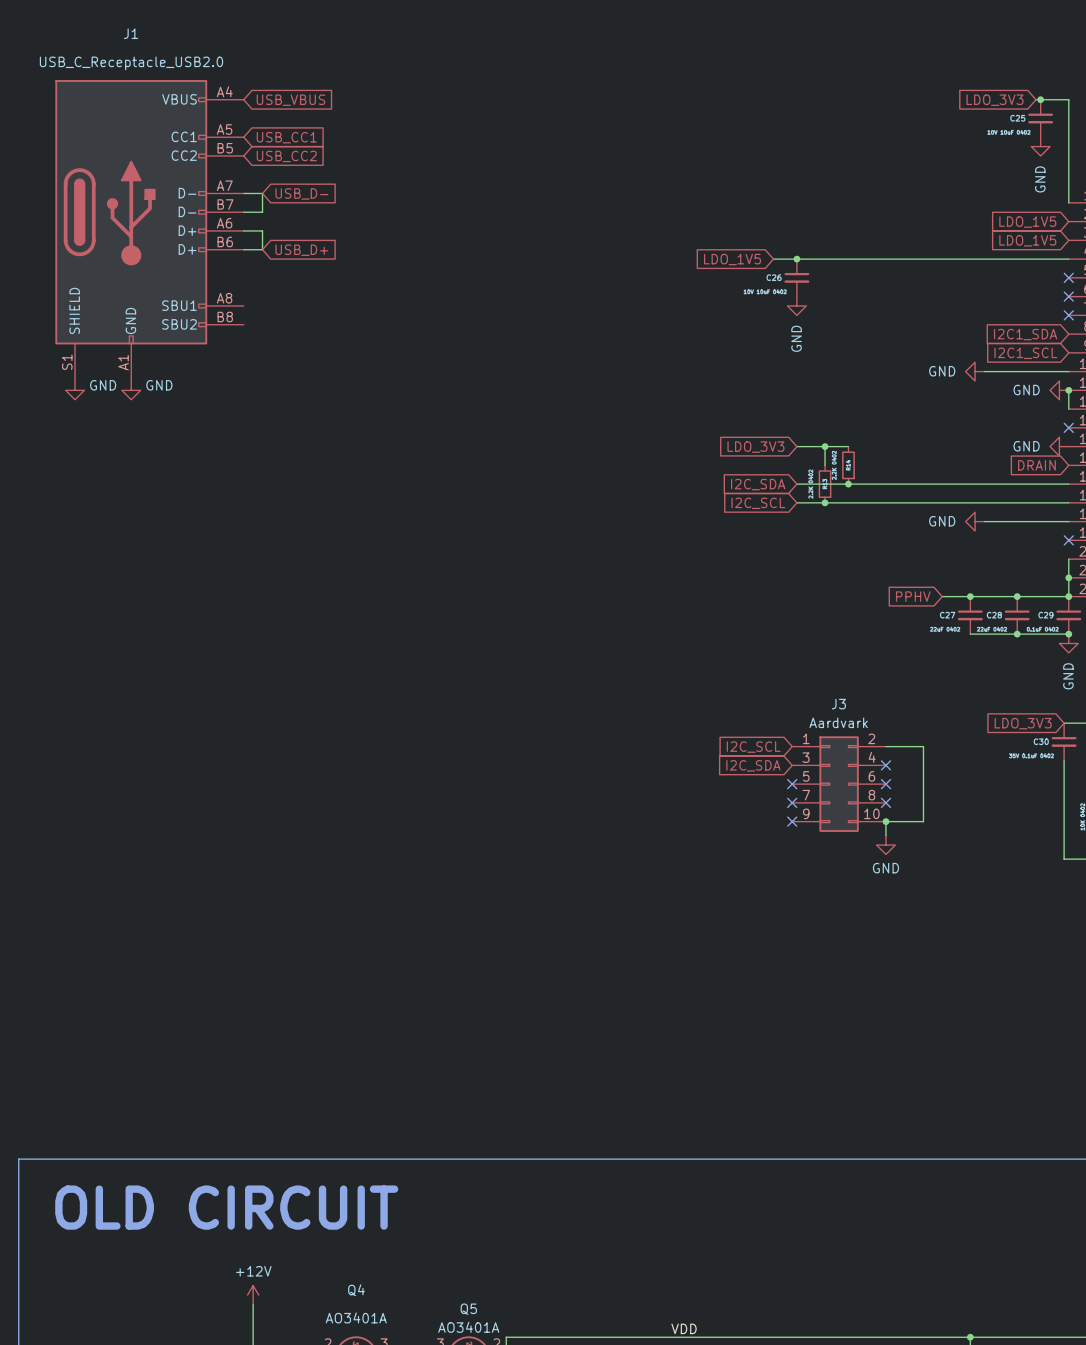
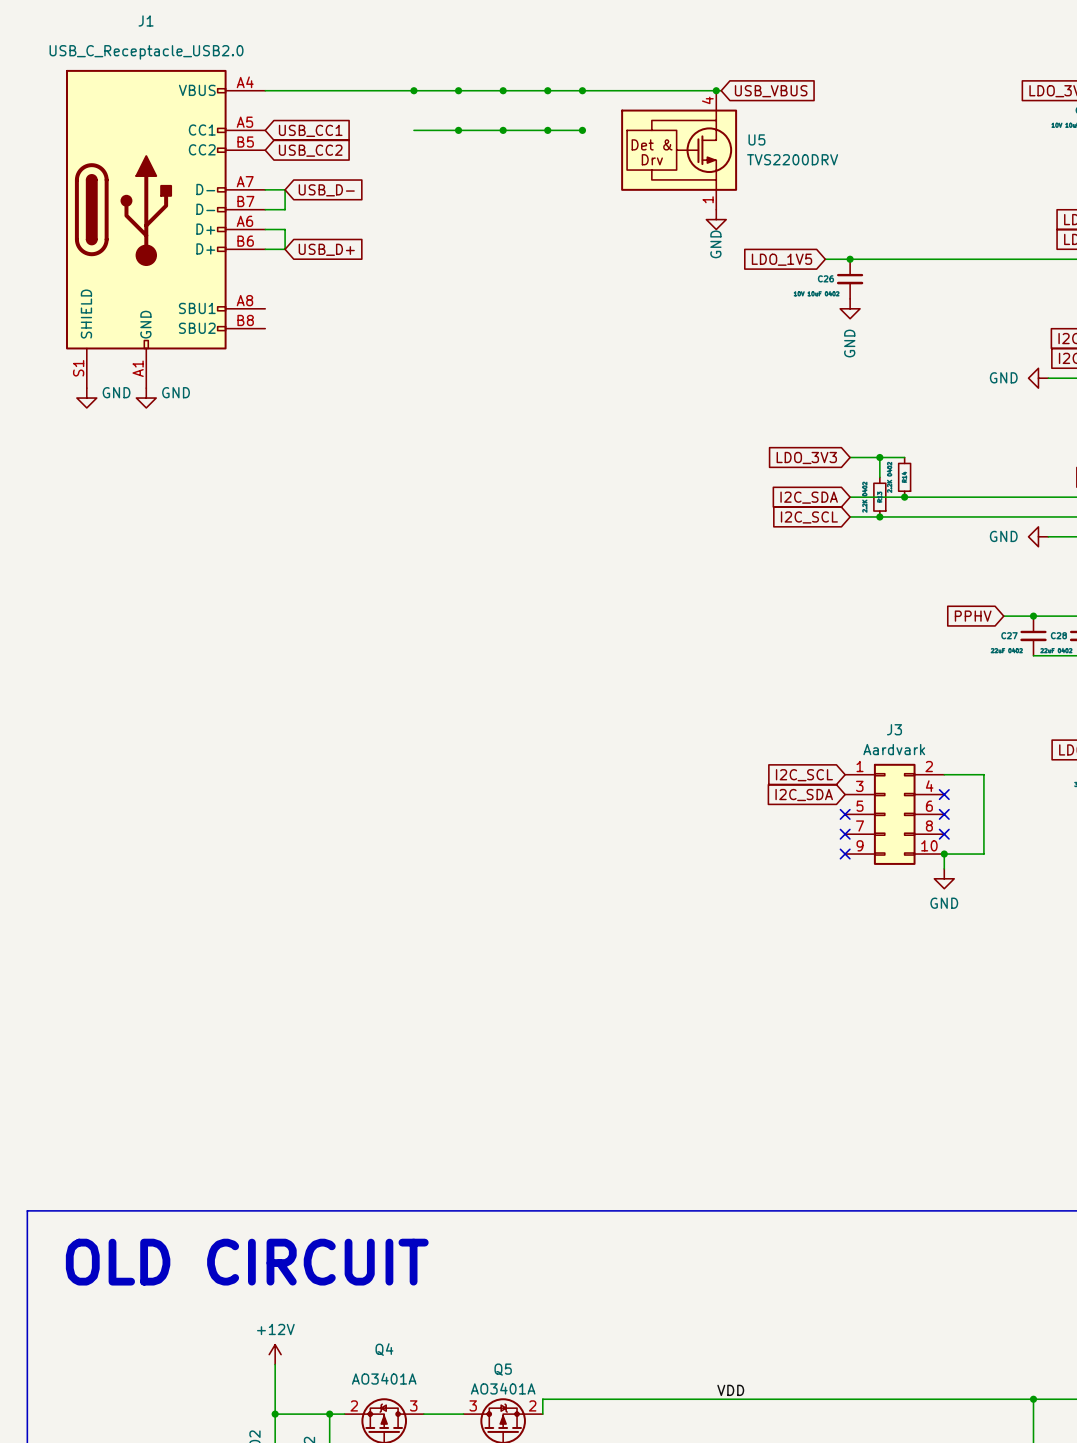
wire: none -> (265, 90) (721, 90)
junction: none -> (413, 90)
junction: none -> (458, 90)
junction: none -> (503, 90)
junction: none -> (547, 90)
junction: none -> (582, 90)
junction: none -> (716, 90)
global label: USB_VBUS (290, 100) -> none
global label: none -> USB_VBUS (771, 91)
wire: none -> (413, 130) (582, 130)
junction: none -> (458, 130)
junction: none -> (503, 130)
junction: none -> (547, 130)
junction: none -> (582, 130)
U5: none -> TVS2200DRV (679, 150)
power symbol: none -> GND (716, 219)

